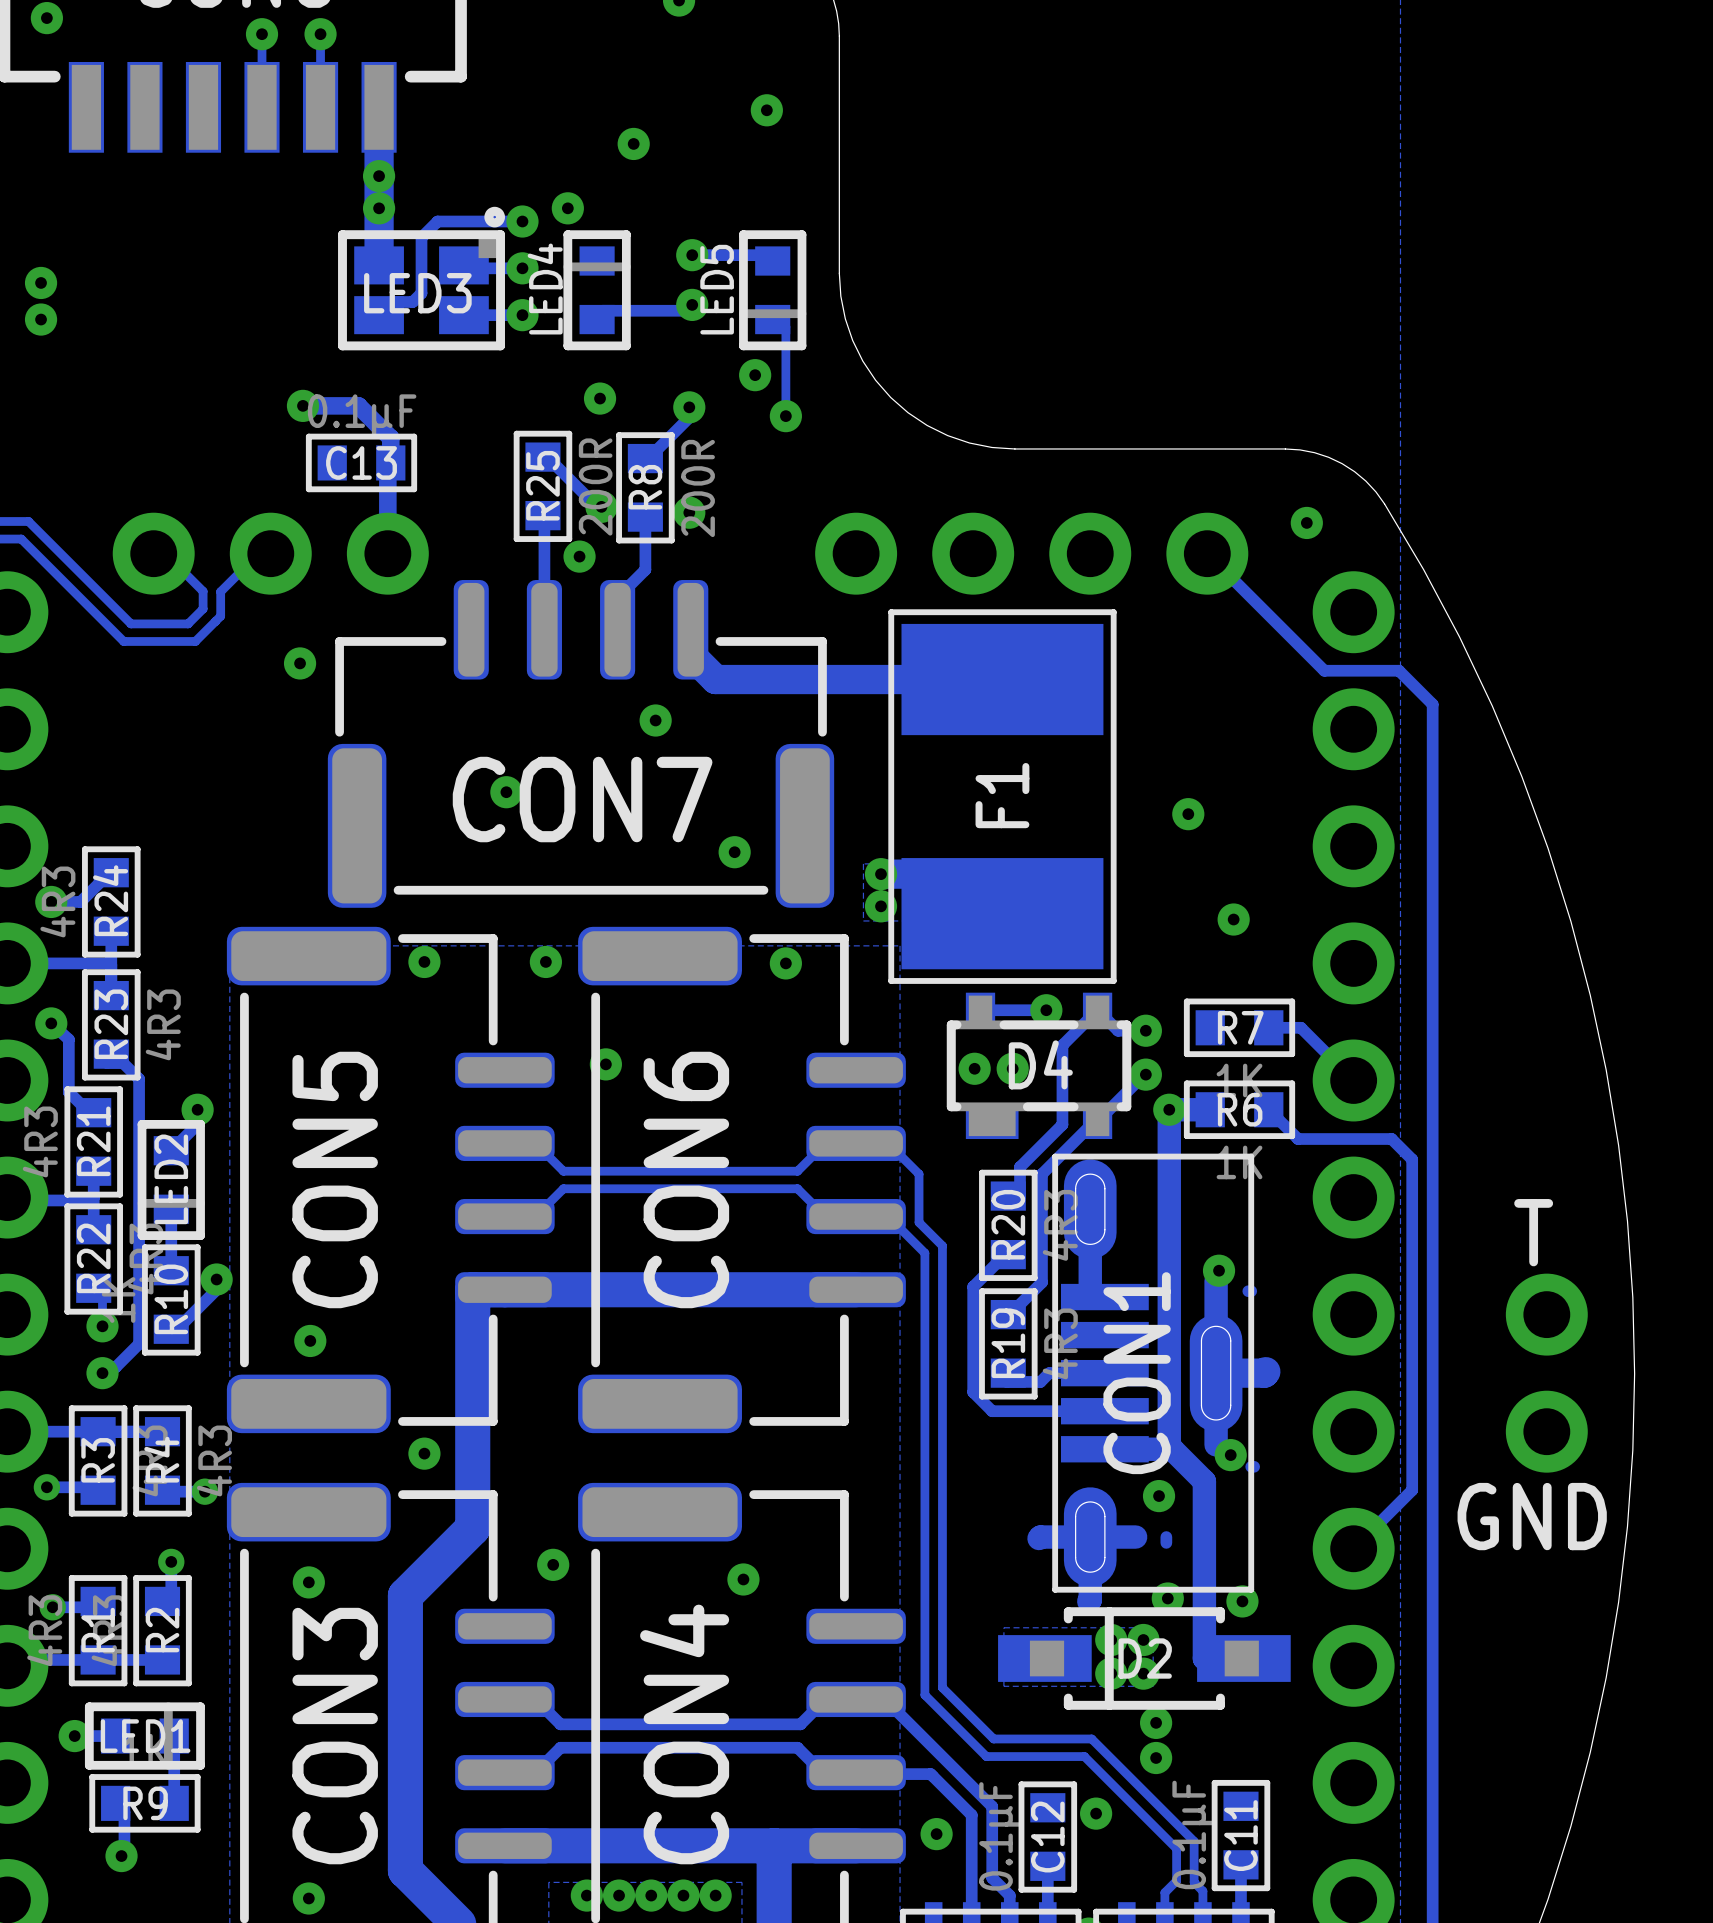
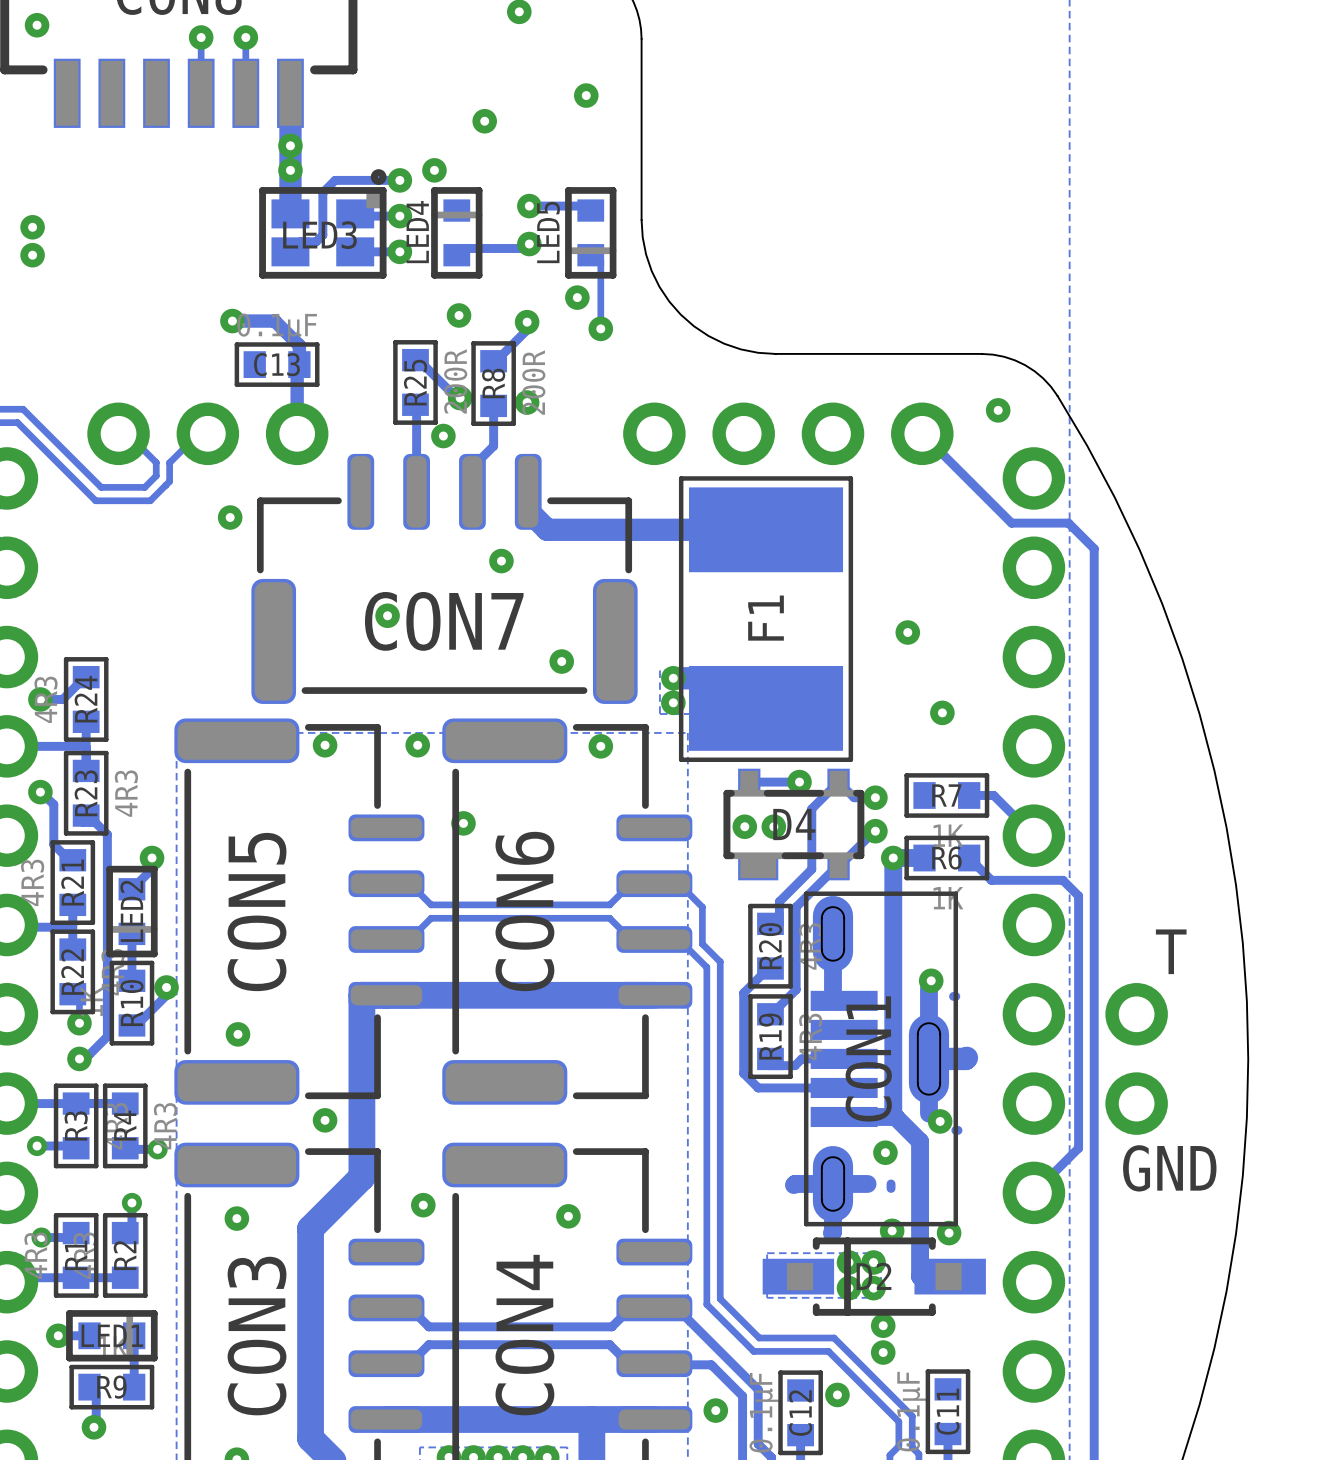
part position: (1546, 1314) -> (1136, 1014)
part position: (1546, 1431) -> (1136, 1103)

